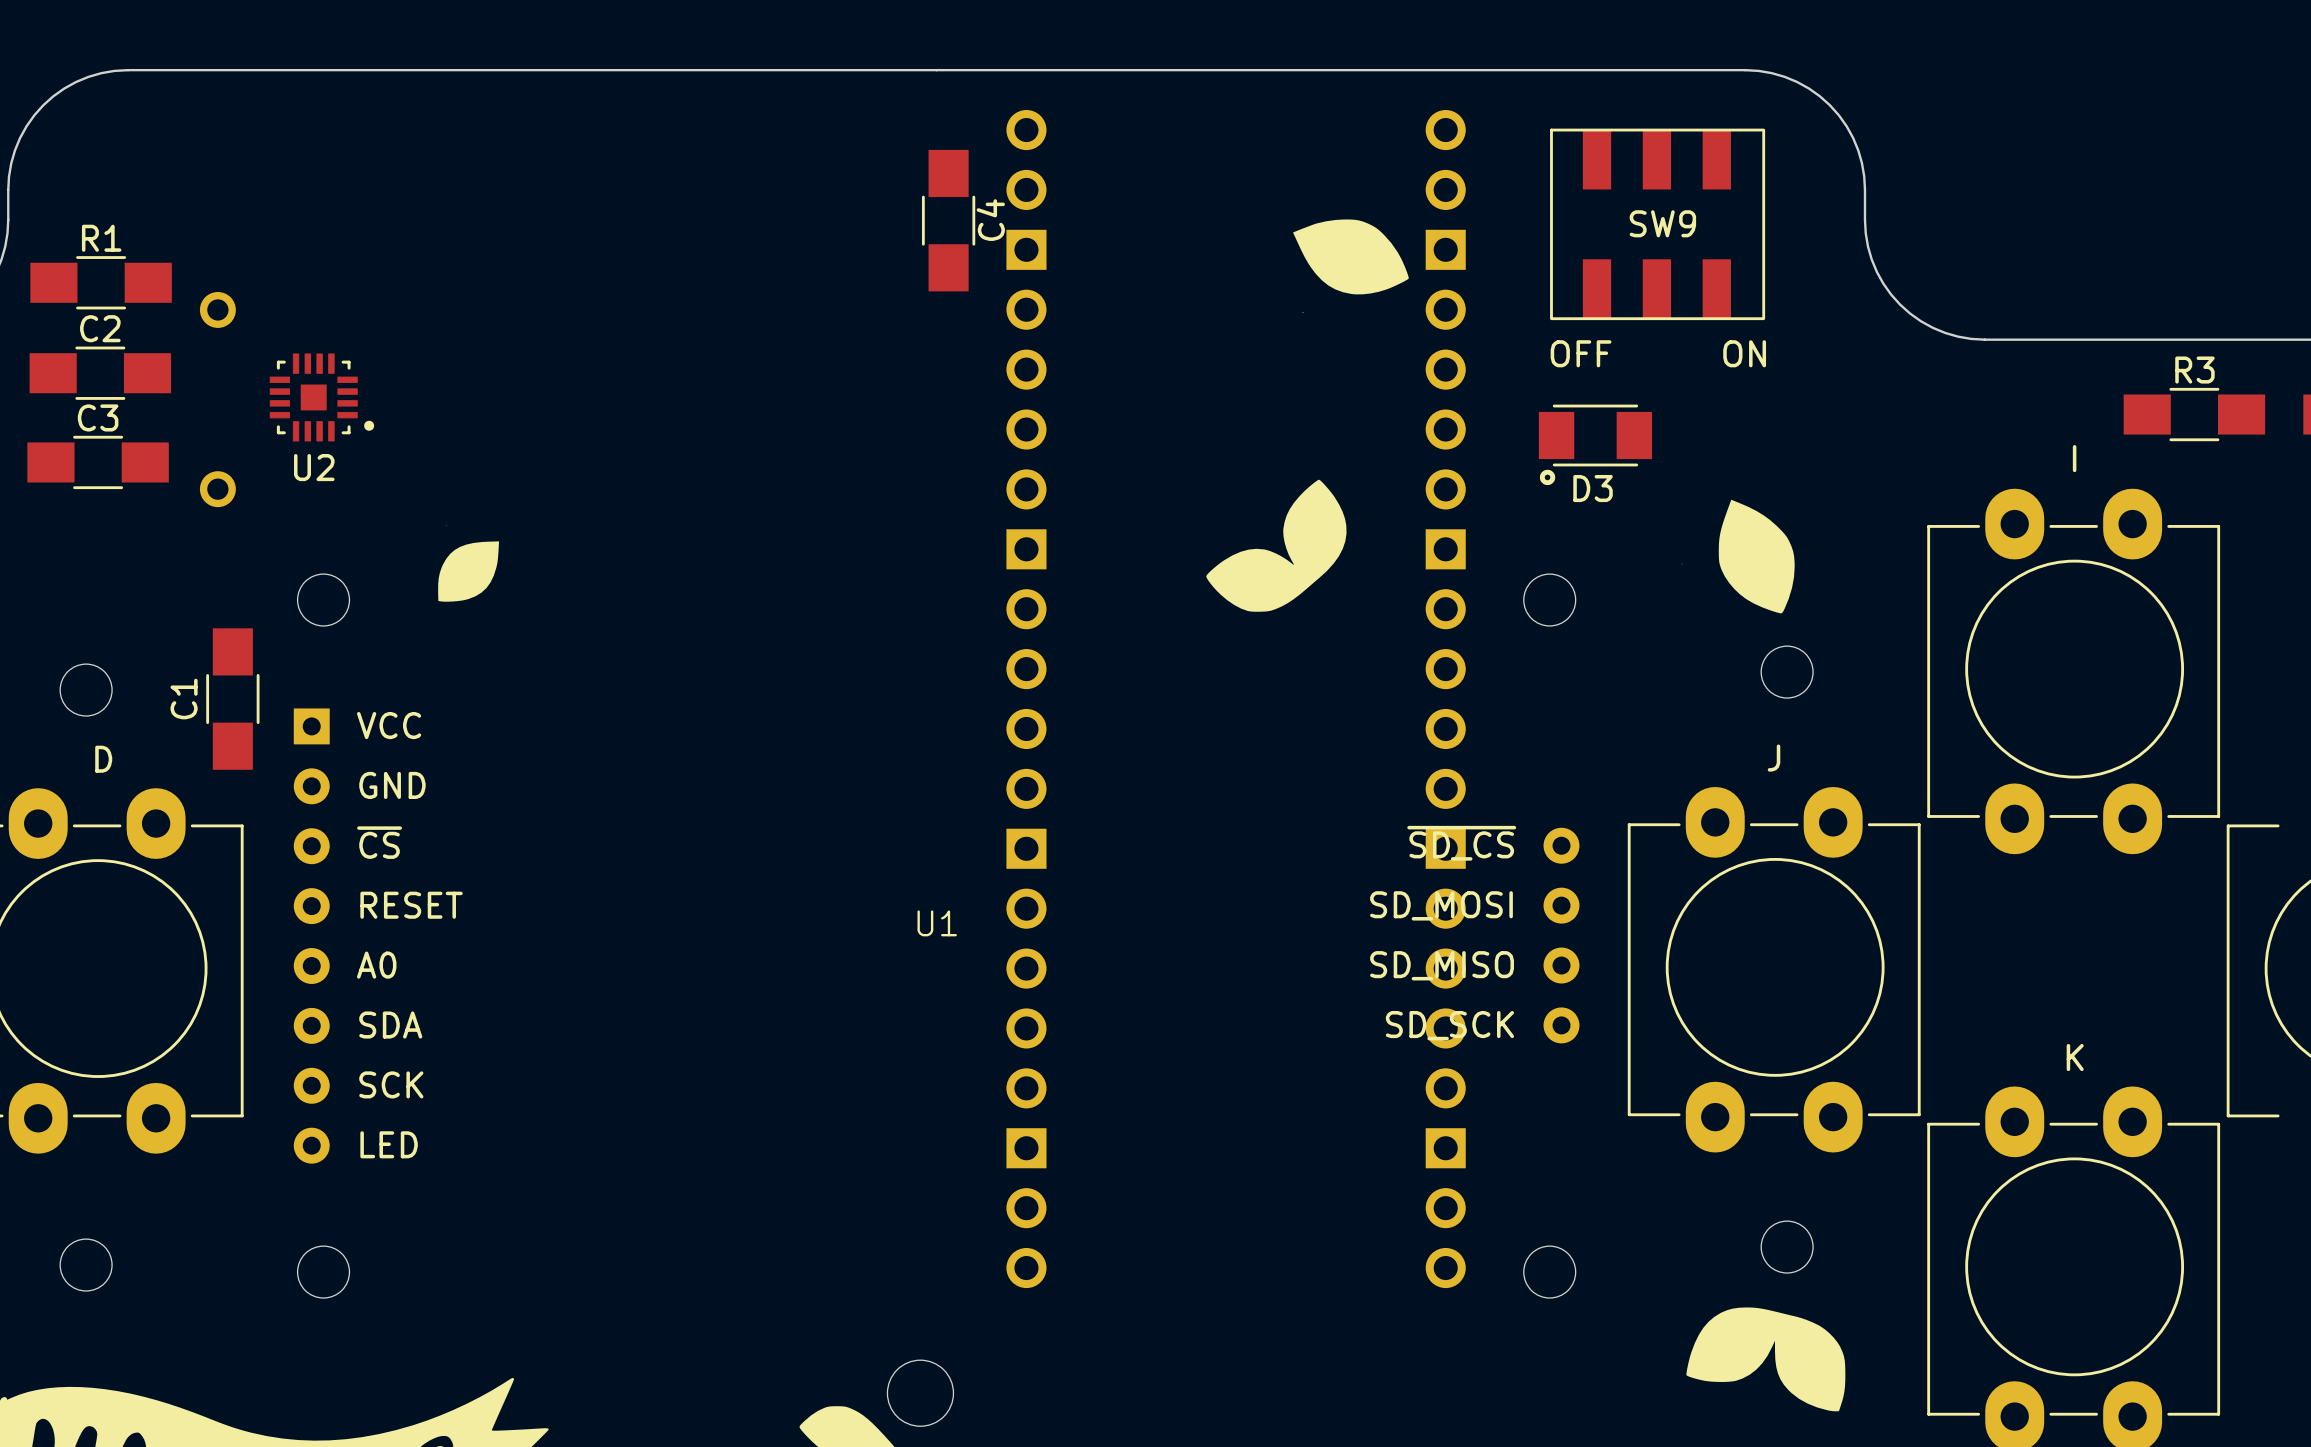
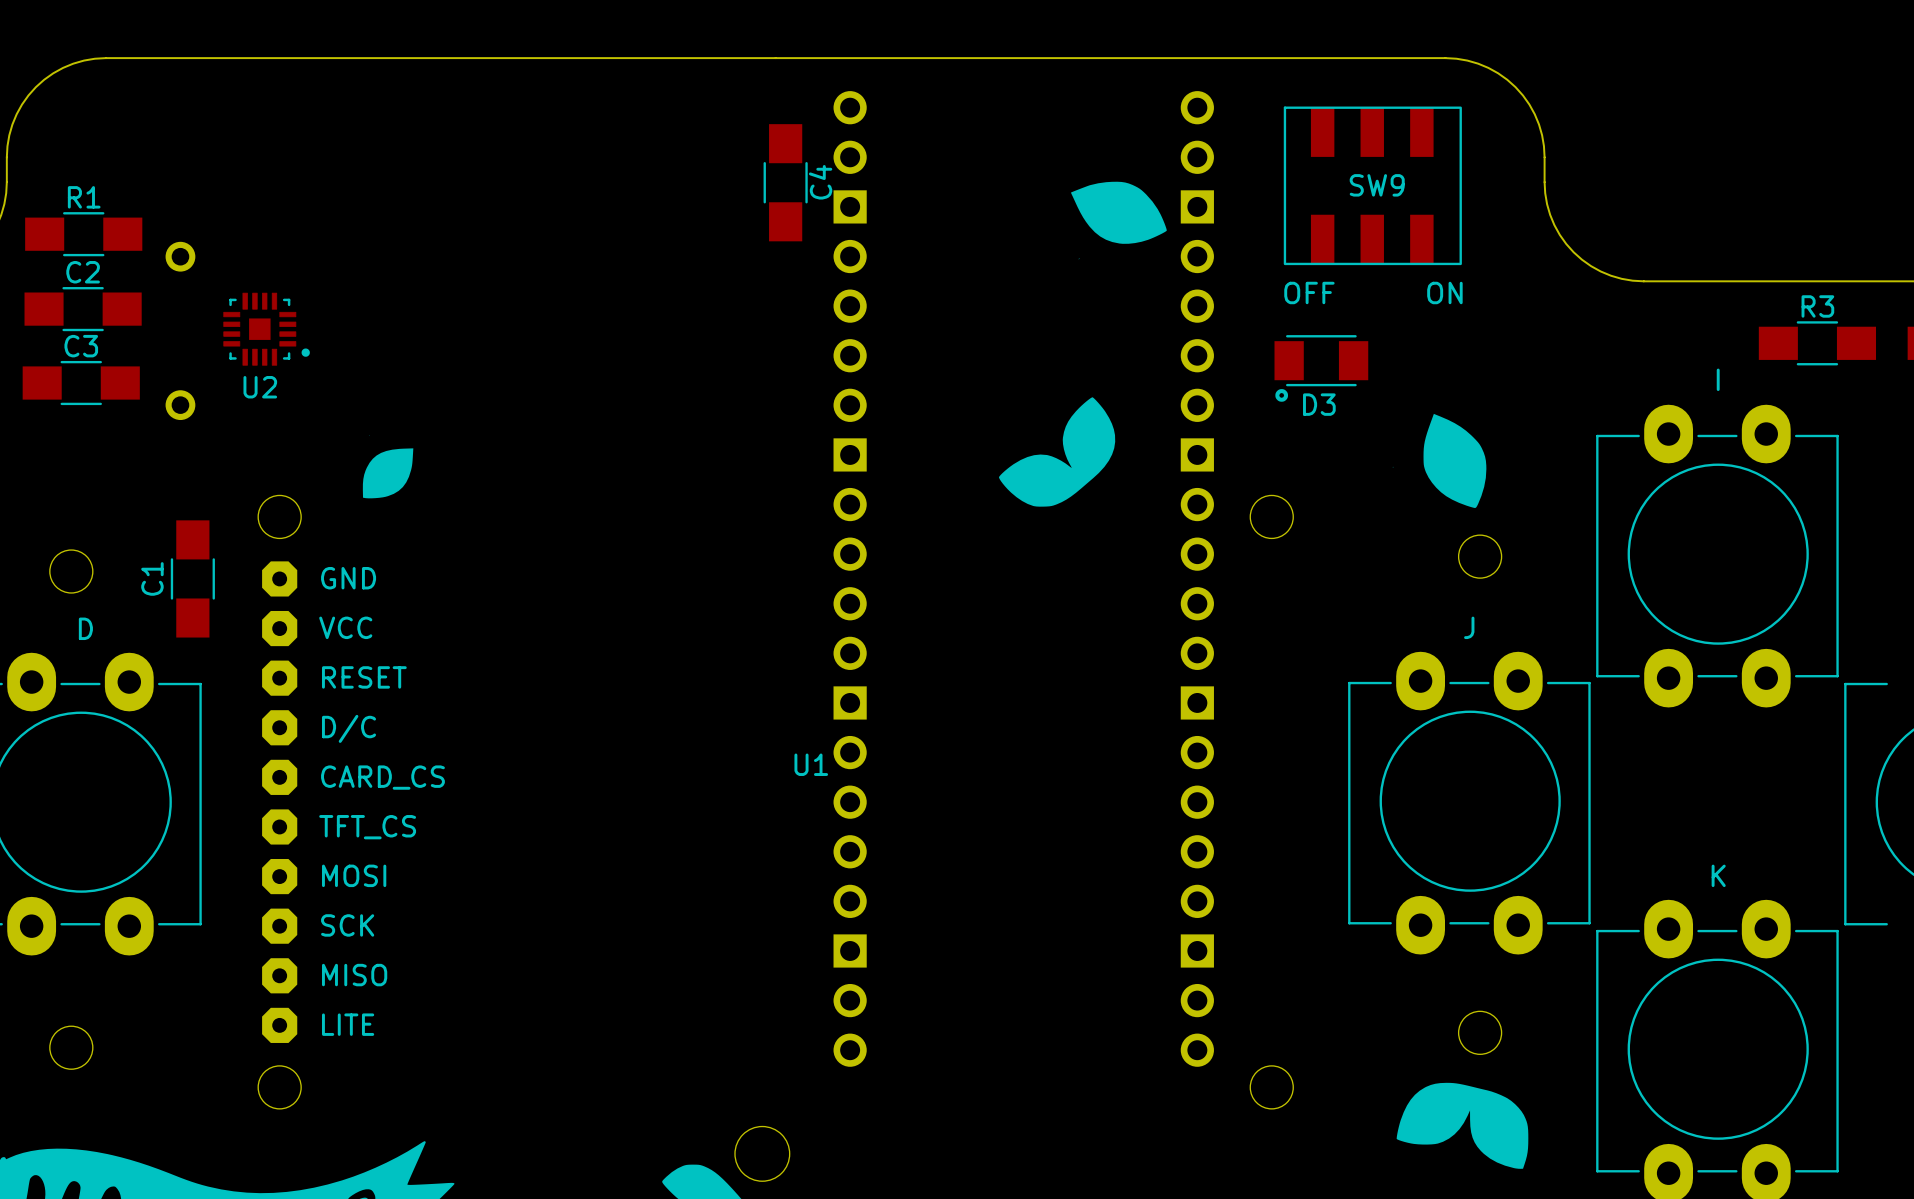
U1 footprint: [293, 574, 1580, 1299] -> [258, 495, 1294, 1109]
U1 name position: U1 (937, 923) -> U1 (811, 764)

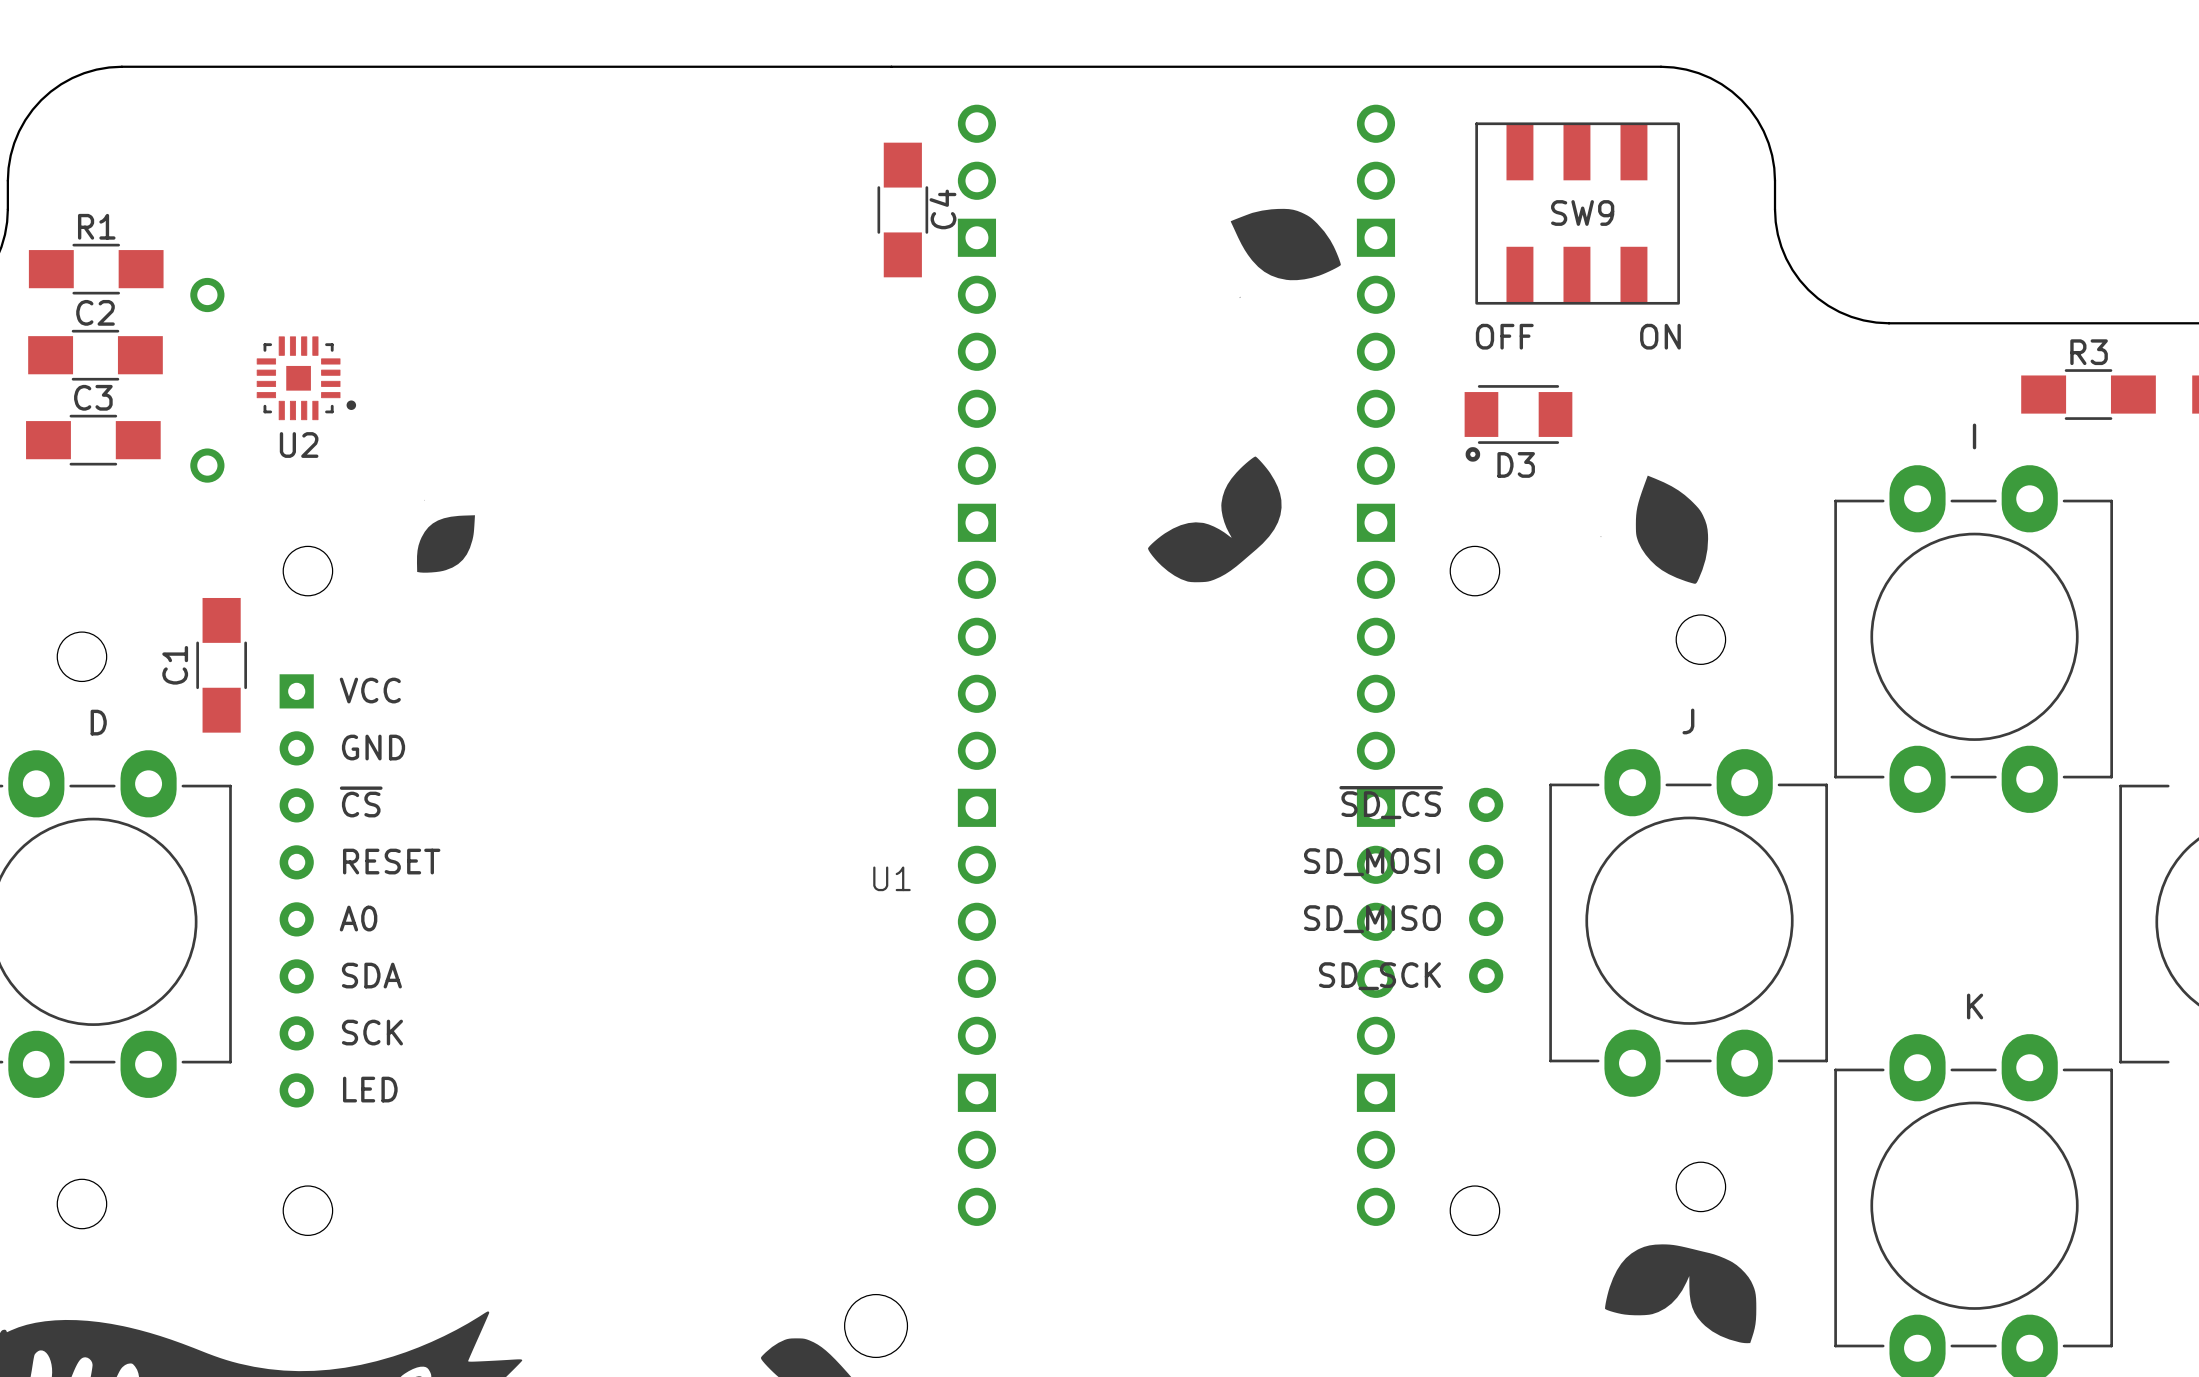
U1 footprint: [258, 495, 1294, 1109] -> [279, 546, 1504, 1236]
U1 name position: U1 (811, 764) -> U1 (891, 878)

